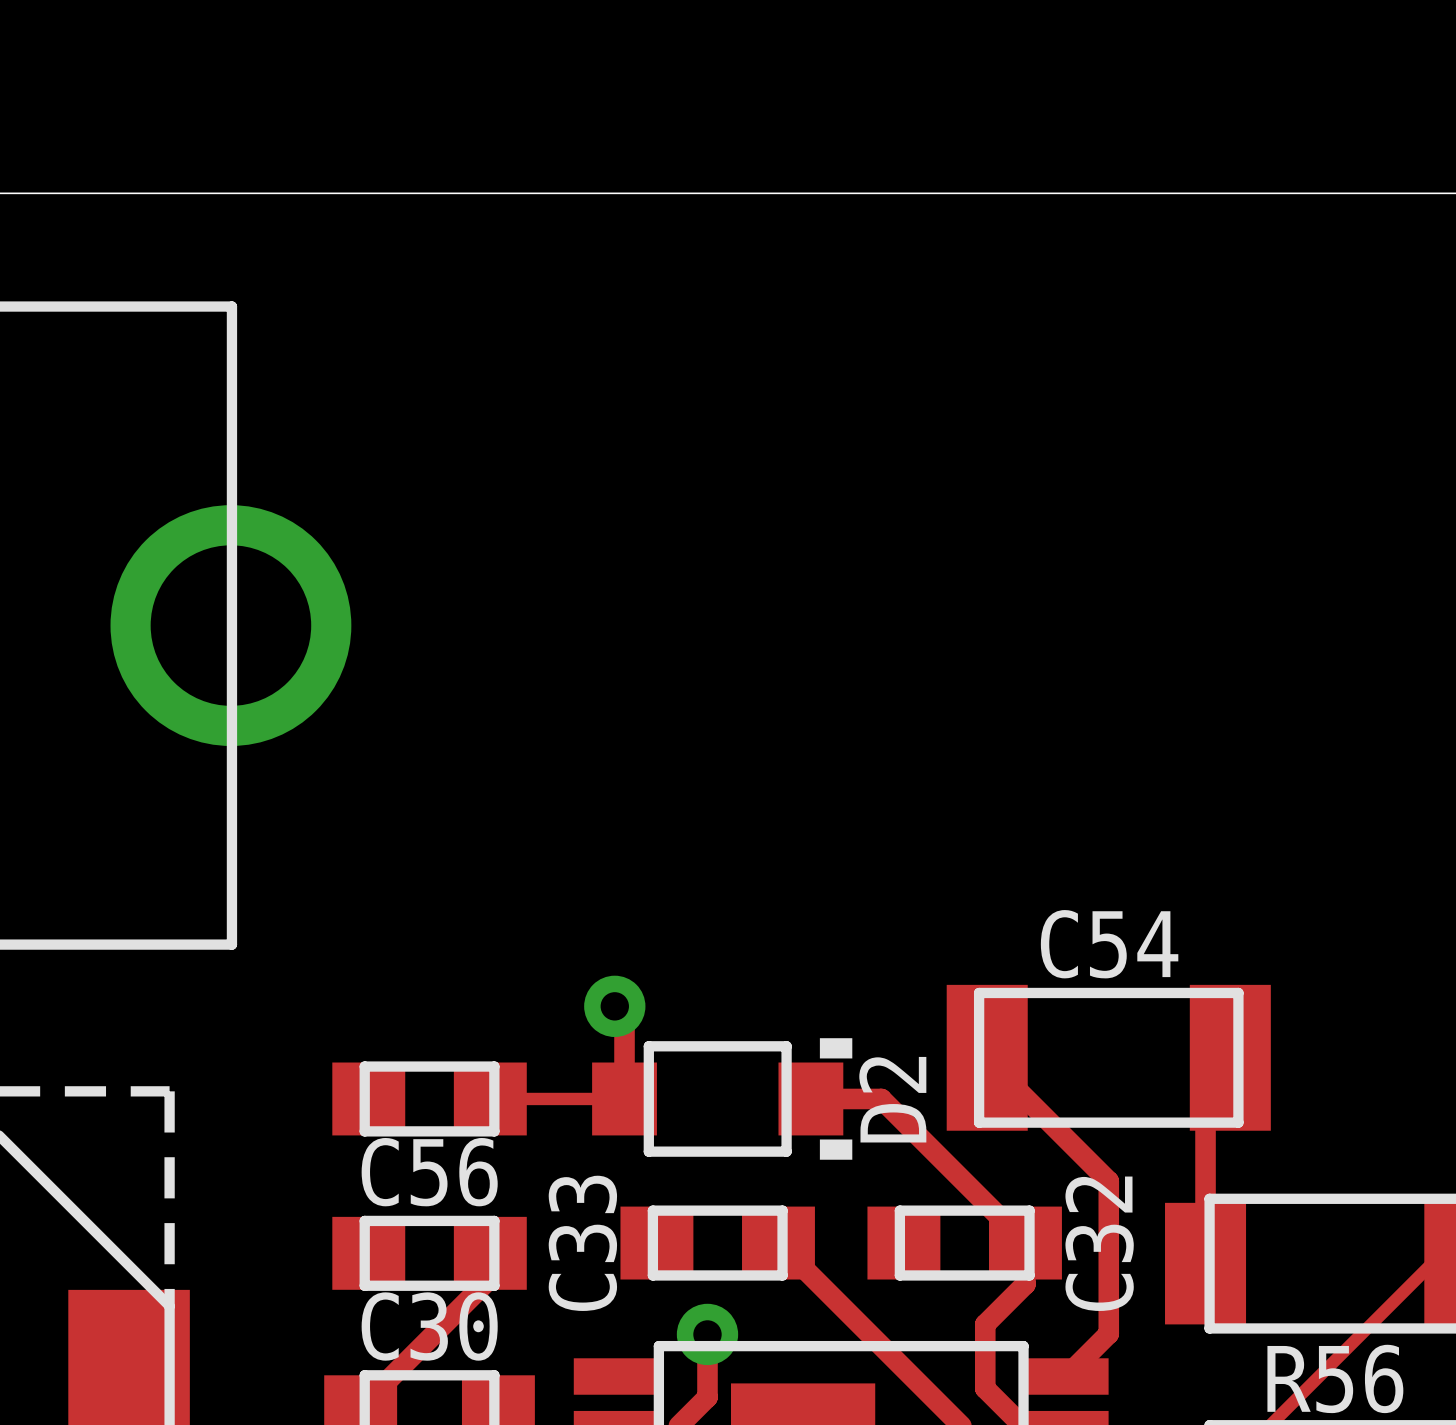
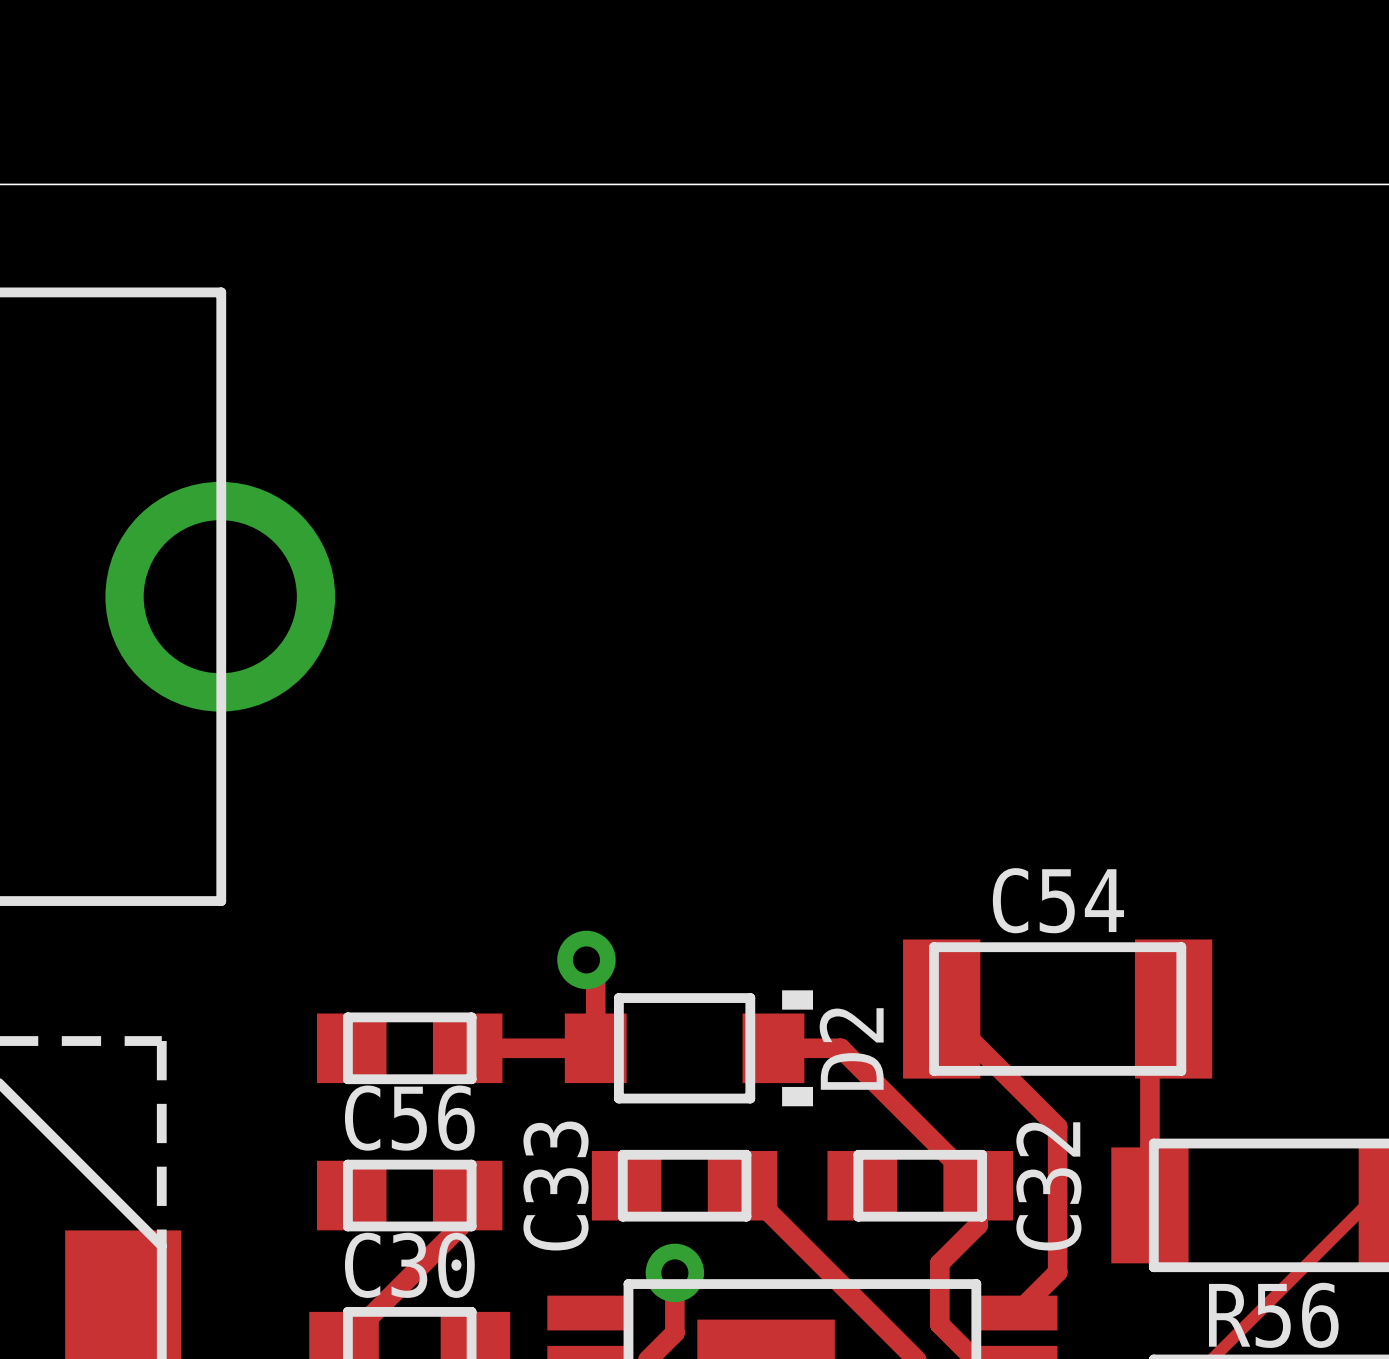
track width: thin (490, 1098) (624, 1098) -> thick (467, 1048) (595, 1048)

